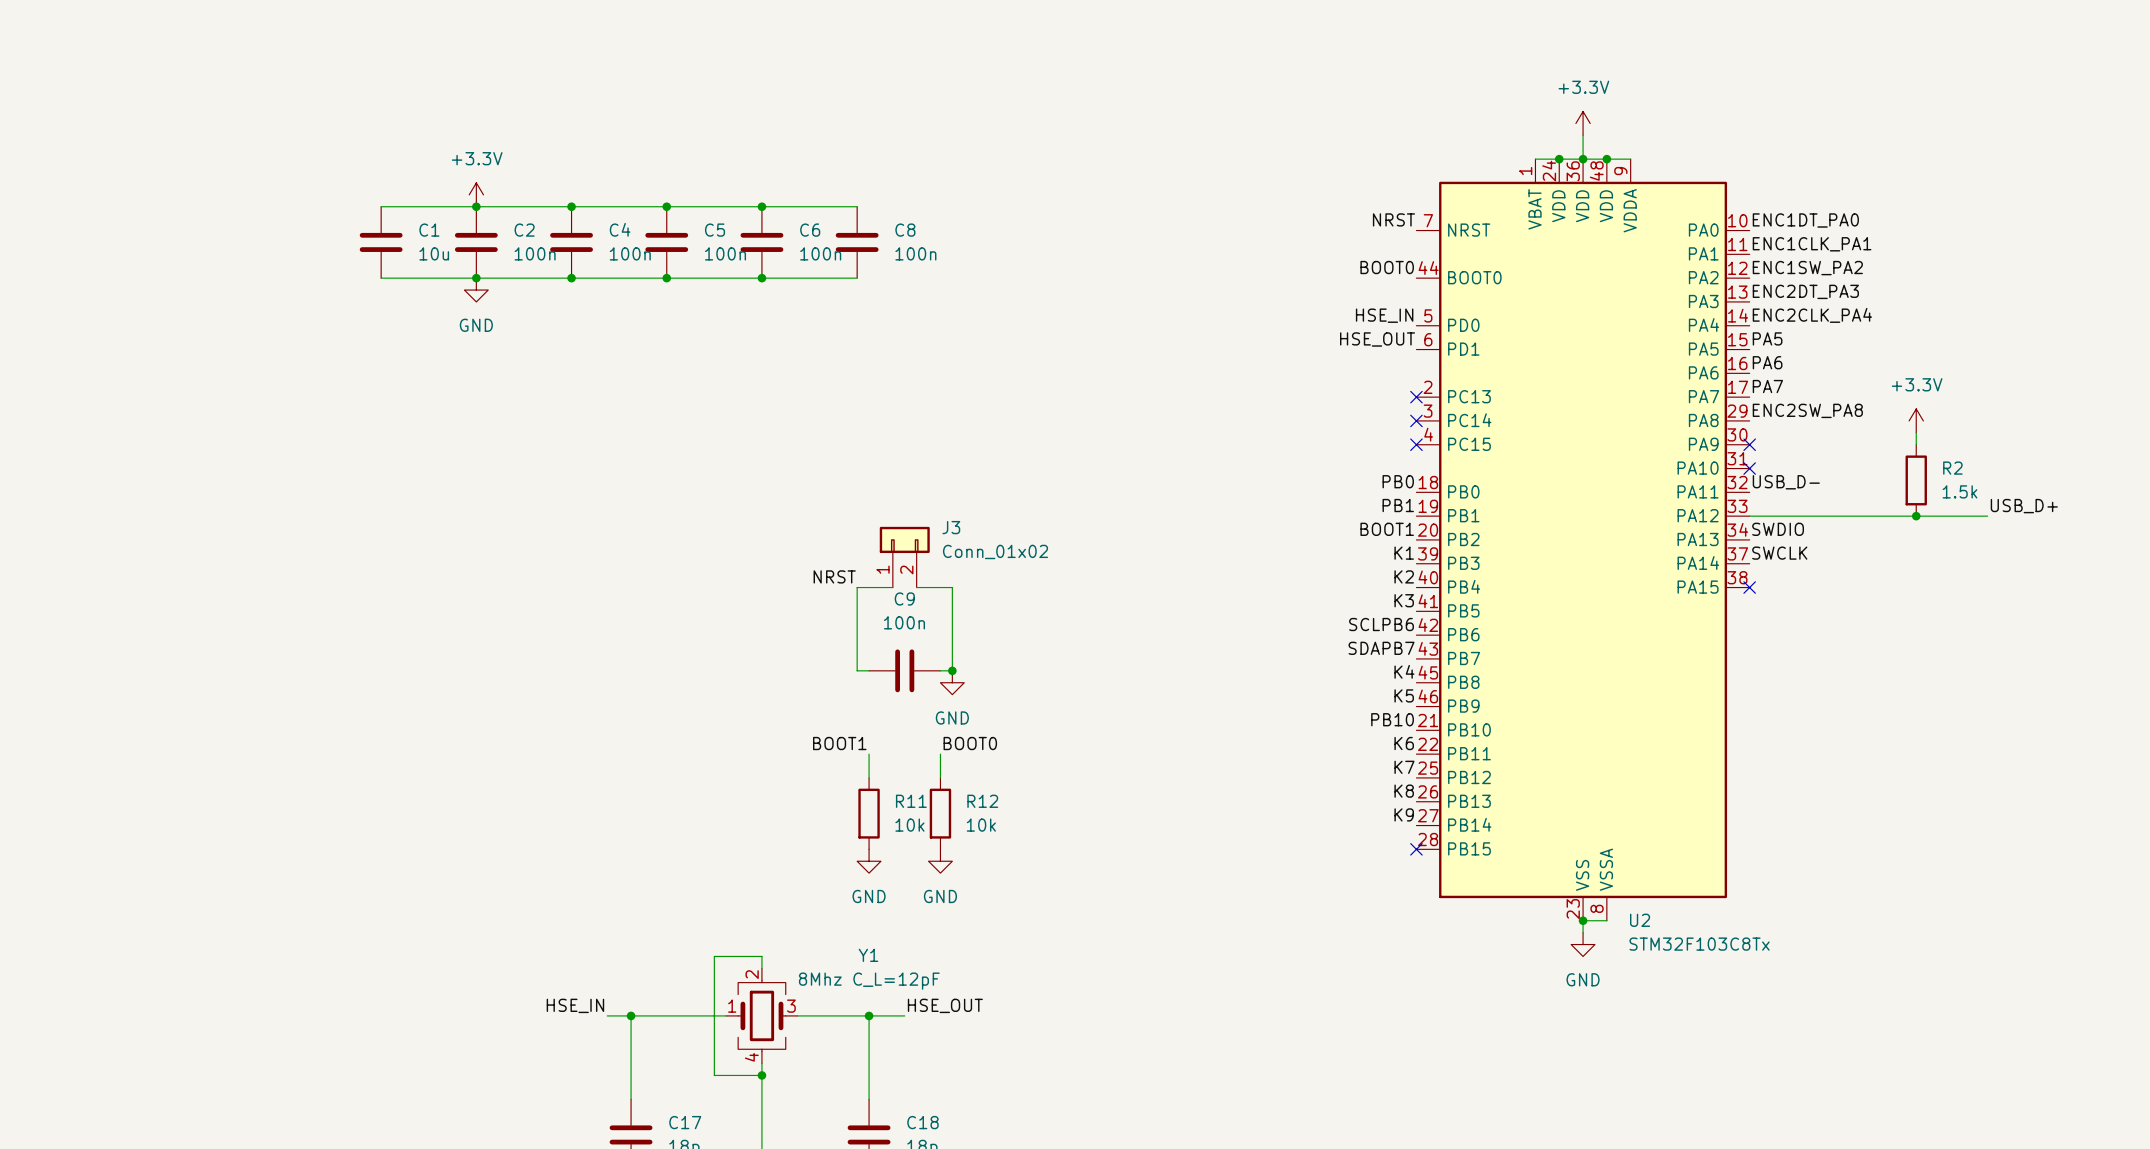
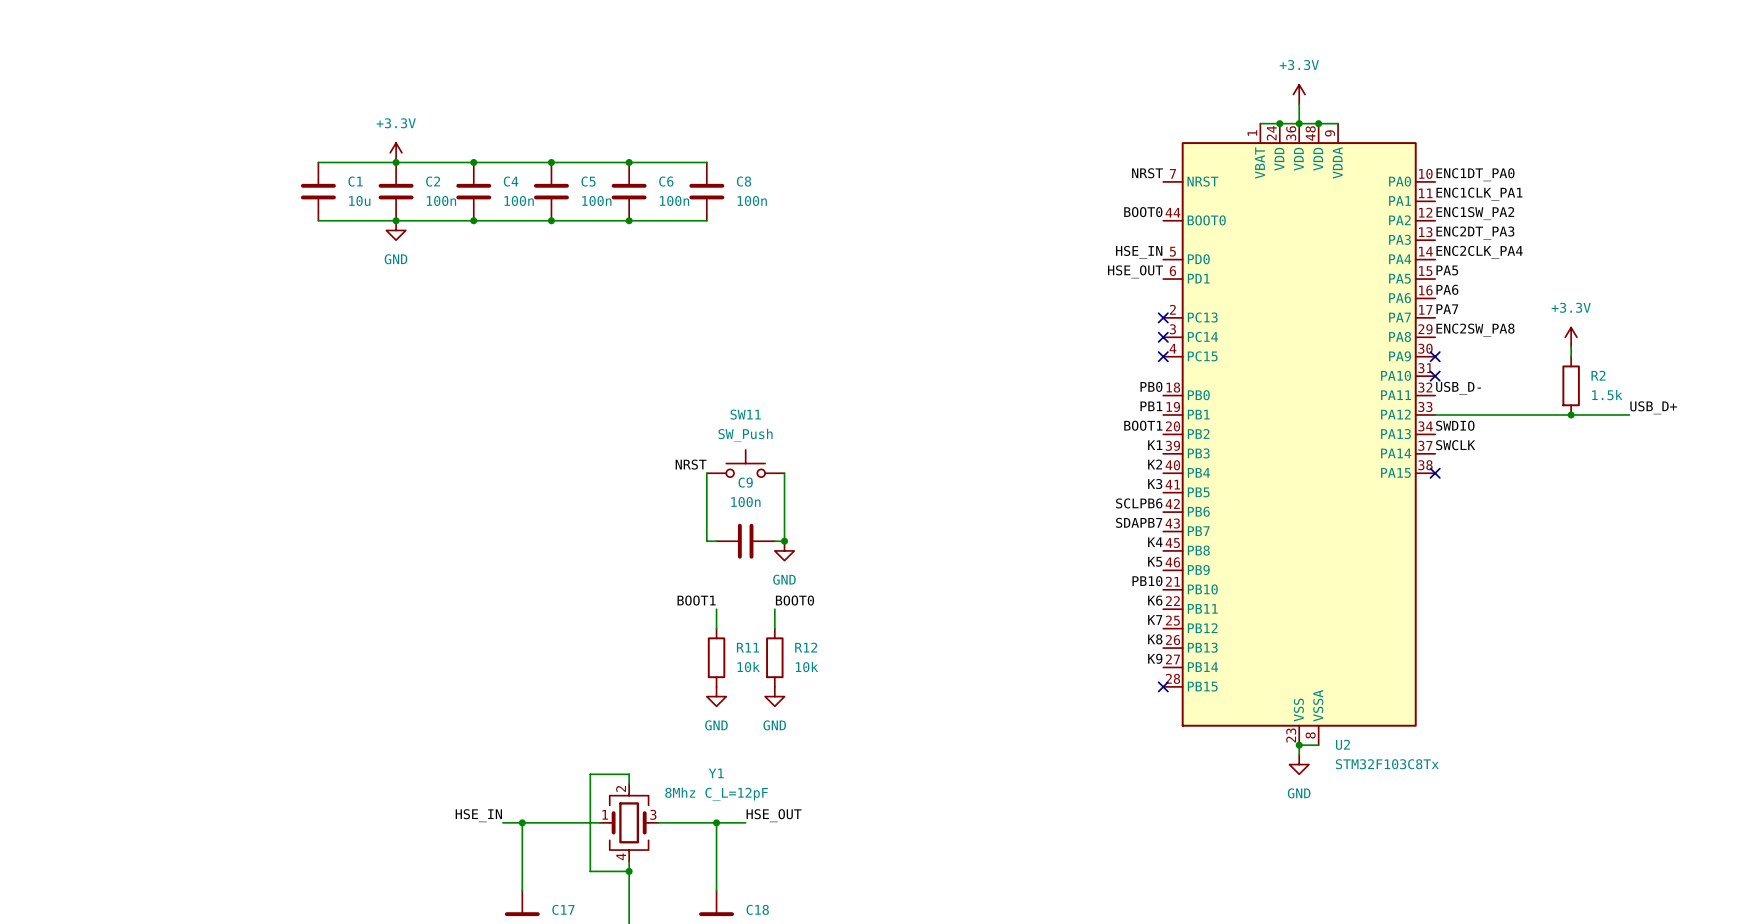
J3: Conn_01x02 (904, 557) -> none
SW11: none -> SW_Push (745, 463)

